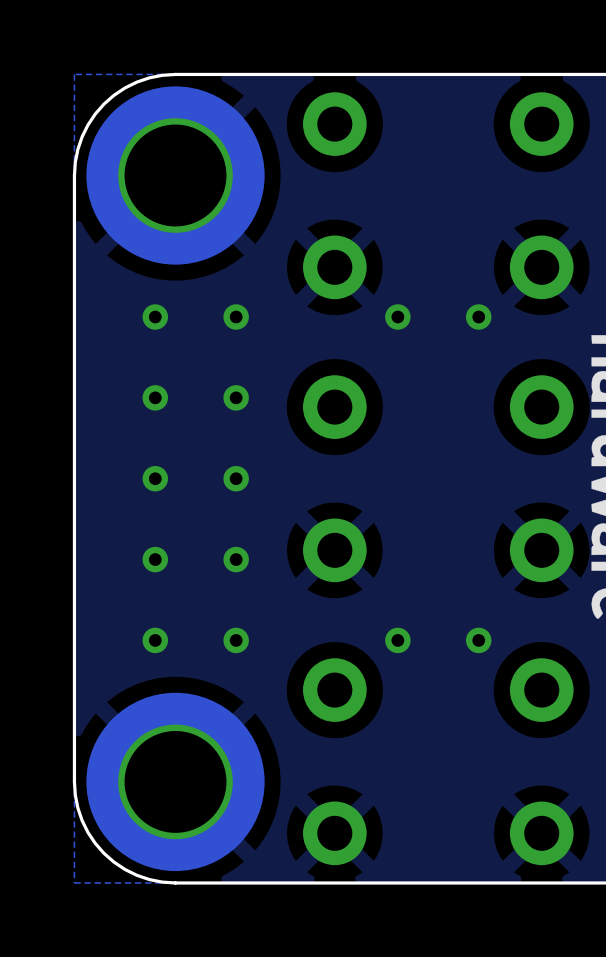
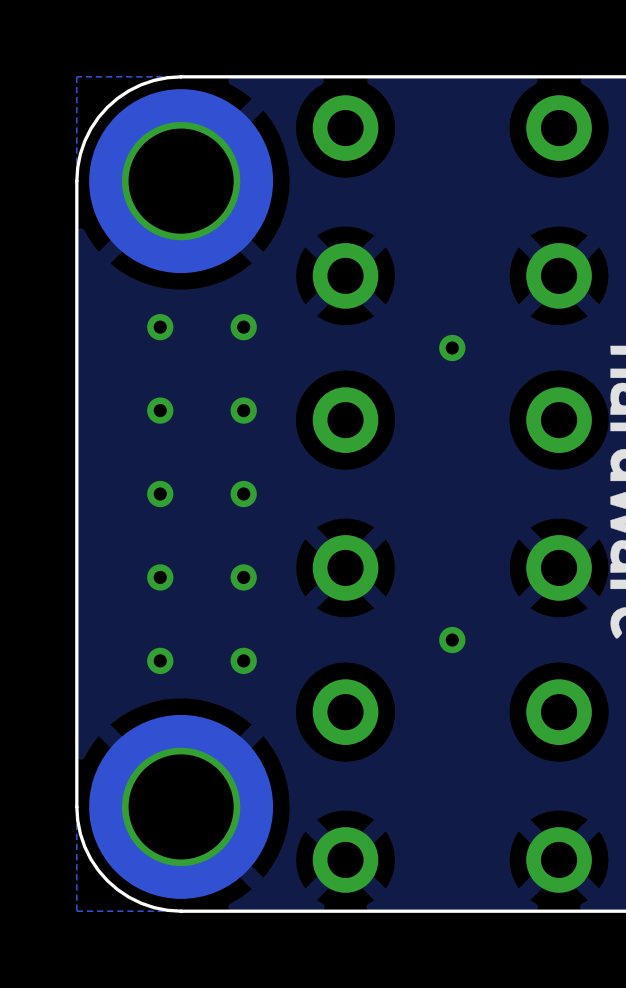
via: (397, 317) -> none
via: (478, 317) -> none
via: none -> (452, 348)
via: none -> (452, 640)
via: (397, 640) -> none
via: (478, 640) -> none

